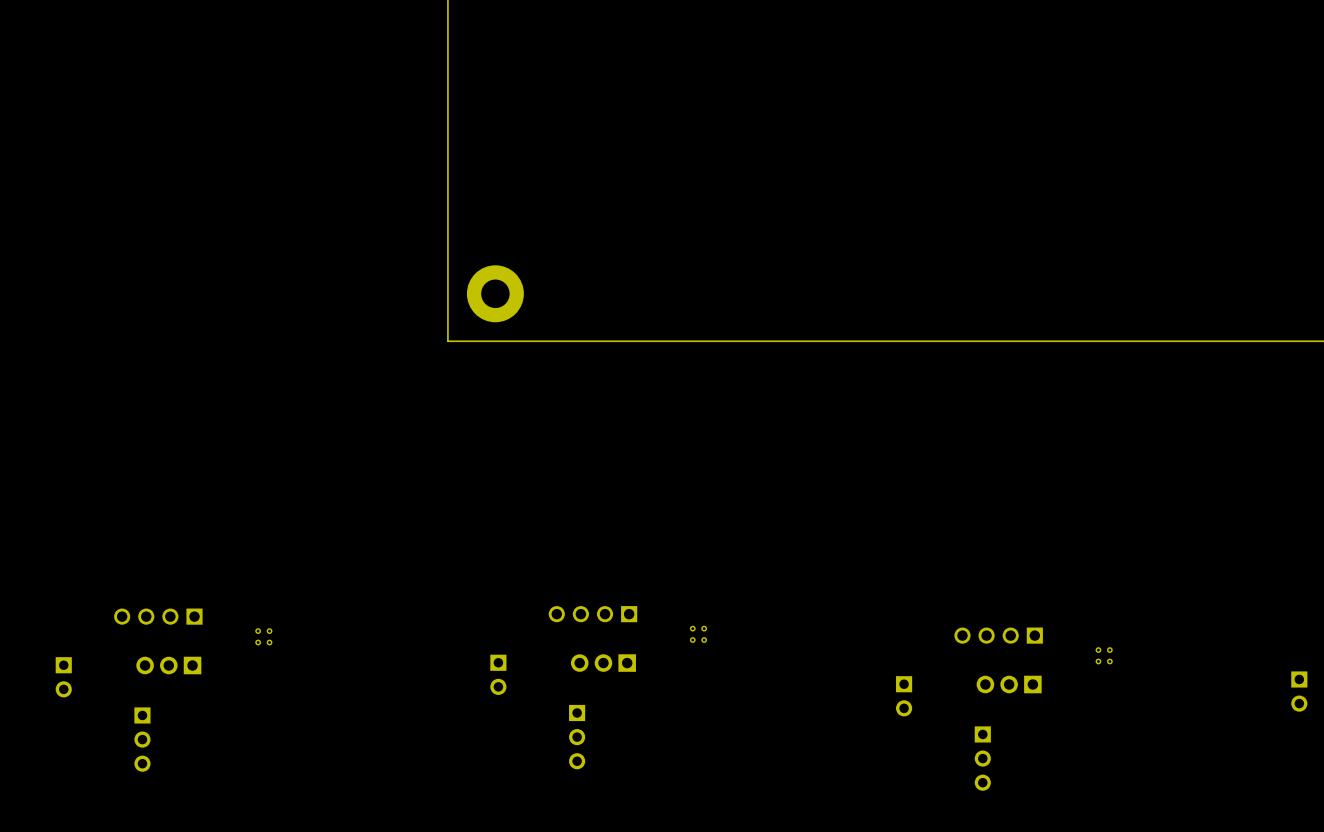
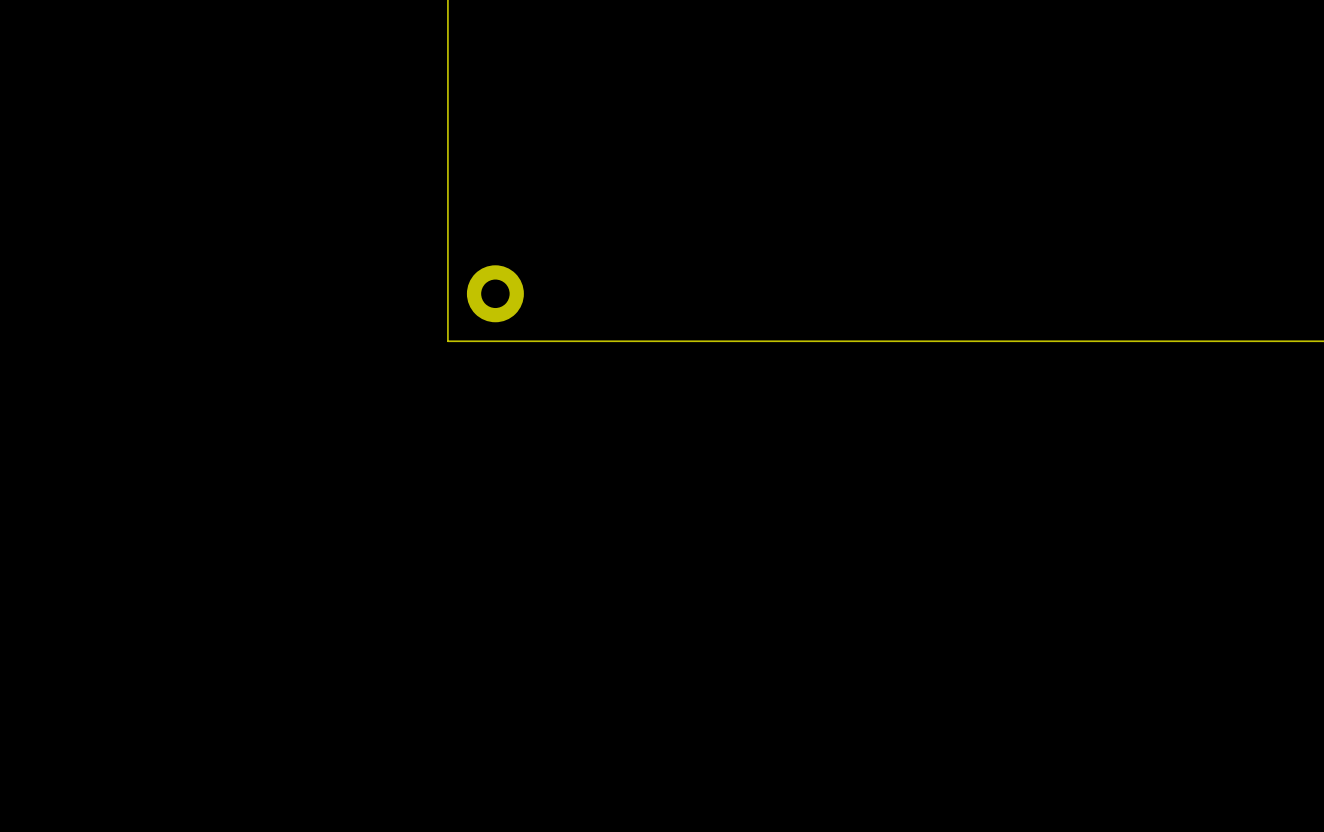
part: (592, 614) -> none
part: (158, 616) -> none
part: (698, 634) -> none
part: (998, 635) -> none
part: (263, 636) -> none
part: (1104, 655) -> none
part: (603, 663) -> none
part: (168, 665) -> none
part: (498, 674) -> none
part: (63, 677) -> none
part: (1009, 684) -> none
part: (1299, 691) -> none
part: (904, 696) -> none
part: (577, 737) -> none
part: (142, 739) -> none
part: (982, 758) -> none

